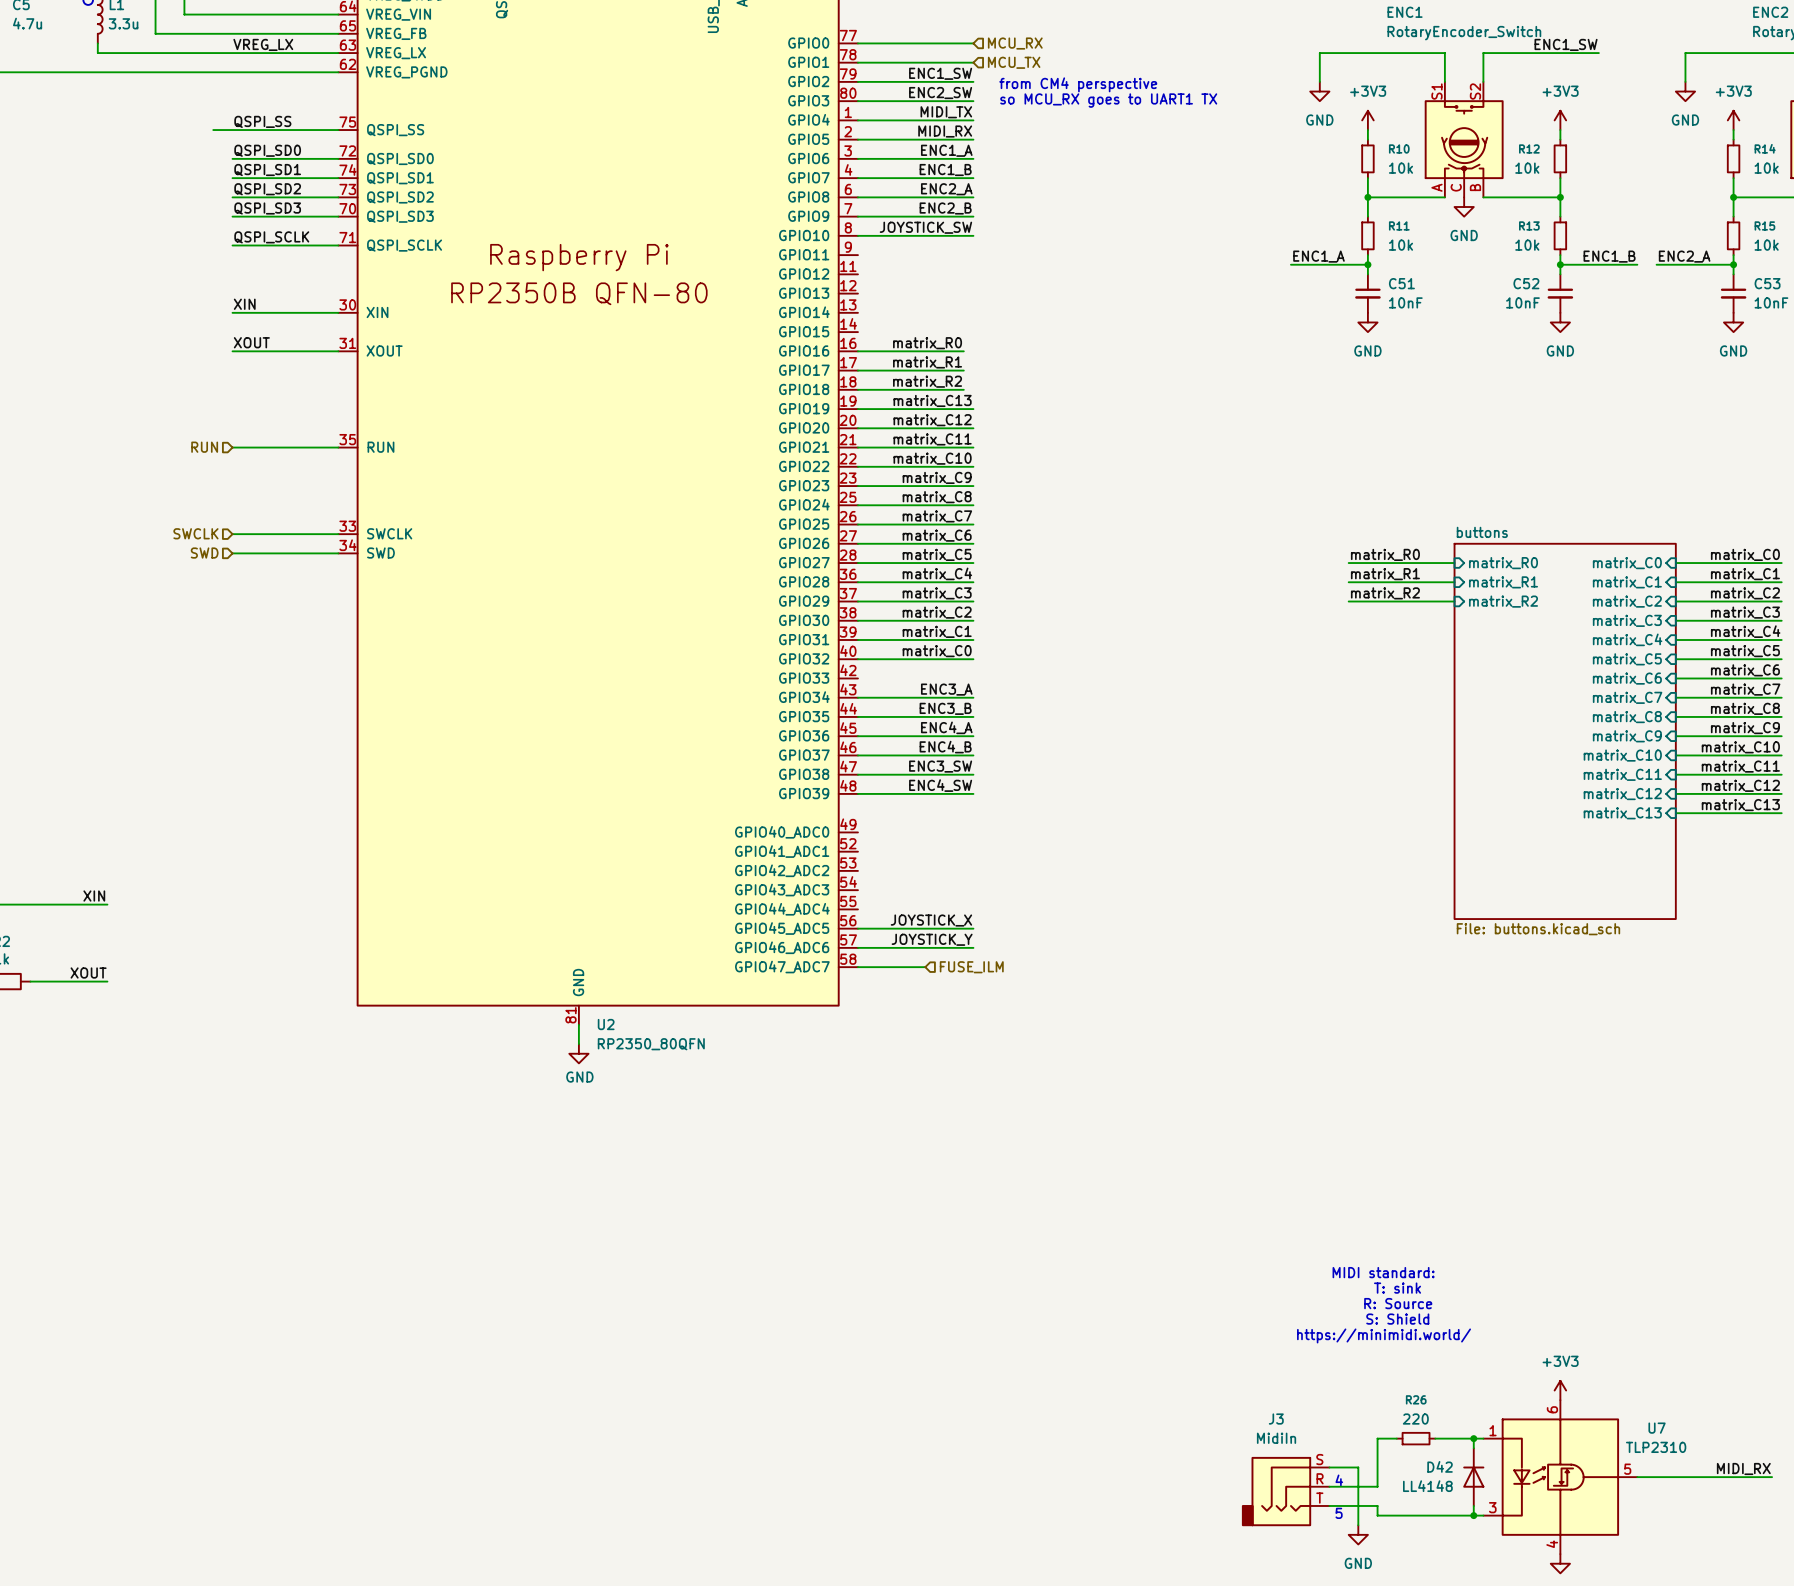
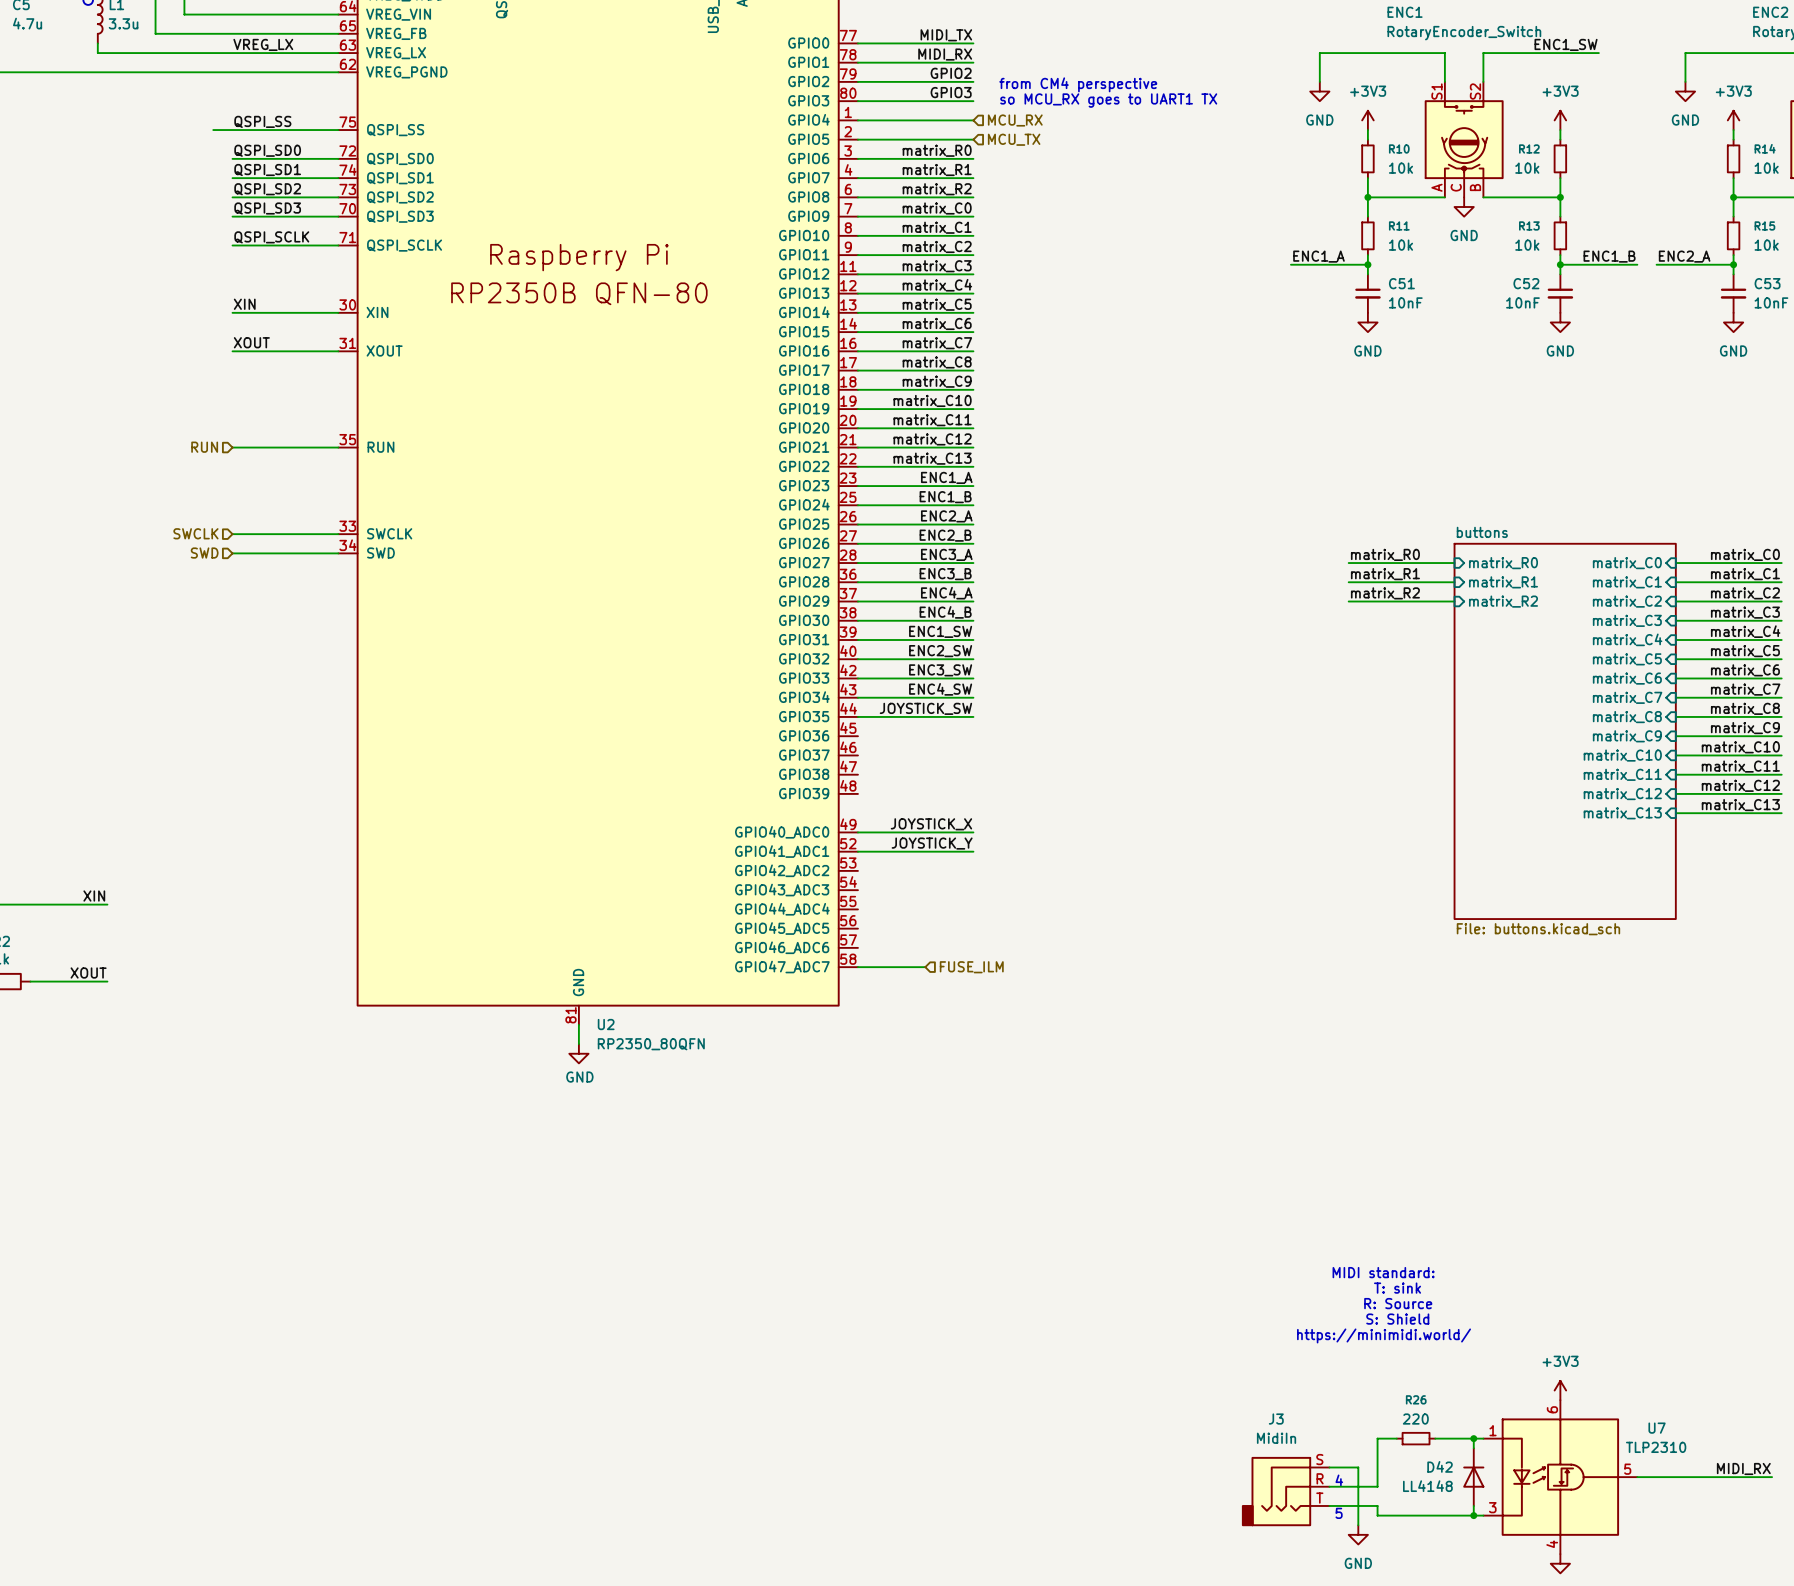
hierarchical label position: MCU_RX (1015, 43) -> MCU_RX (1015, 120)
hierarchical label position: MCU_TX (1014, 62) -> MCU_TX (1014, 139)
label: ENC1_SW (940, 73) -> GPIO2 (951, 73)
label: ENC2_SW (940, 93) -> GPIO3 (951, 92)
label position: MIDI_TX (946, 112) -> MIDI_TX (946, 35)
label position: MIDI_RX (945, 131) -> MIDI_RX (945, 54)
label: ENC1_A (946, 150) -> matrix_R0 (937, 150)
label: ENC1_B (945, 170) -> matrix_R1 (937, 170)
label: ENC2_A (946, 189) -> matrix_R2 (937, 189)
label: ENC2_B (945, 208) -> matrix_C0 (937, 208)
label: JOYSTICK_SW (925, 227) -> matrix_C1 (937, 227)
label: none -> matrix_C2 (937, 246)
wire: none -> (857, 255) (973, 255)
label: none -> matrix_C3 (937, 266)
wire: none -> (857, 274) (973, 274)
label: none -> matrix_C4 (937, 285)
wire: none -> (857, 293) (973, 293)
label: none -> matrix_C5 (937, 304)
wire: none -> (857, 312) (973, 312)
label: none -> matrix_C6 (937, 323)
wire: none -> (857, 332) (973, 332)
label: matrix_R0 (927, 343) -> matrix_C7 (937, 343)
wire: none -> (963, 351) (973, 351)
label: matrix_R1 (927, 362) -> matrix_C8 (937, 362)
wire: none -> (963, 370) (973, 370)
label: matrix_R2 (927, 381) -> matrix_C9 (937, 381)
wire: none -> (963, 389) (973, 389)
label: matrix_C13 (932, 400) -> matrix_C10 (932, 400)
label: matrix_C12 (932, 420) -> matrix_C11 (932, 420)
label: matrix_C11 (932, 439) -> matrix_C12 (932, 439)
label: matrix_C10 (932, 458) -> matrix_C13 (932, 458)
label: matrix_C9 (937, 477) -> ENC1_A (946, 477)
label: matrix_C8 (937, 497) -> ENC1_B (945, 497)
label: matrix_C7 (937, 516) -> ENC2_A (946, 516)
label: matrix_C6 (937, 535) -> ENC2_B (945, 535)
label: matrix_C5 (937, 554) -> ENC3_A (946, 554)
label: matrix_C4 (937, 573) -> ENC3_B (945, 574)
label: matrix_C3 (937, 593) -> ENC4_A (946, 593)
label: matrix_C2 (937, 612) -> ENC4_B (945, 612)
label: matrix_C1 (937, 631) -> ENC1_SW (940, 631)
label: matrix_C0 (937, 651) -> ENC2_SW (940, 651)
label: ENC3_A (946, 689) -> ENC4_SW (940, 689)
label: ENC3_B (945, 708) -> JOYSTICK_SW (925, 708)
label: ENC4_A (946, 727) -> none
wire: (857, 736) (973, 736) -> none
label: ENC4_B (945, 747) -> none
wire: (857, 755) (973, 755) -> none
label position: ENC3_SW (940, 766) -> ENC3_SW (940, 670)
wire: (857, 774) (973, 774) -> (857, 678) (973, 678)
label: ENC4_SW (940, 785) -> none
wire: (857, 793) (973, 793) -> none
label position: JOYSTICK_X (931, 920) -> JOYSTICK_X (931, 824)
wire: (857, 928) (973, 928) -> (857, 832) (973, 832)
label position: JOYSTICK_Y (932, 939) -> JOYSTICK_Y (932, 843)
wire: (857, 947) (973, 947) -> (857, 851) (973, 851)

